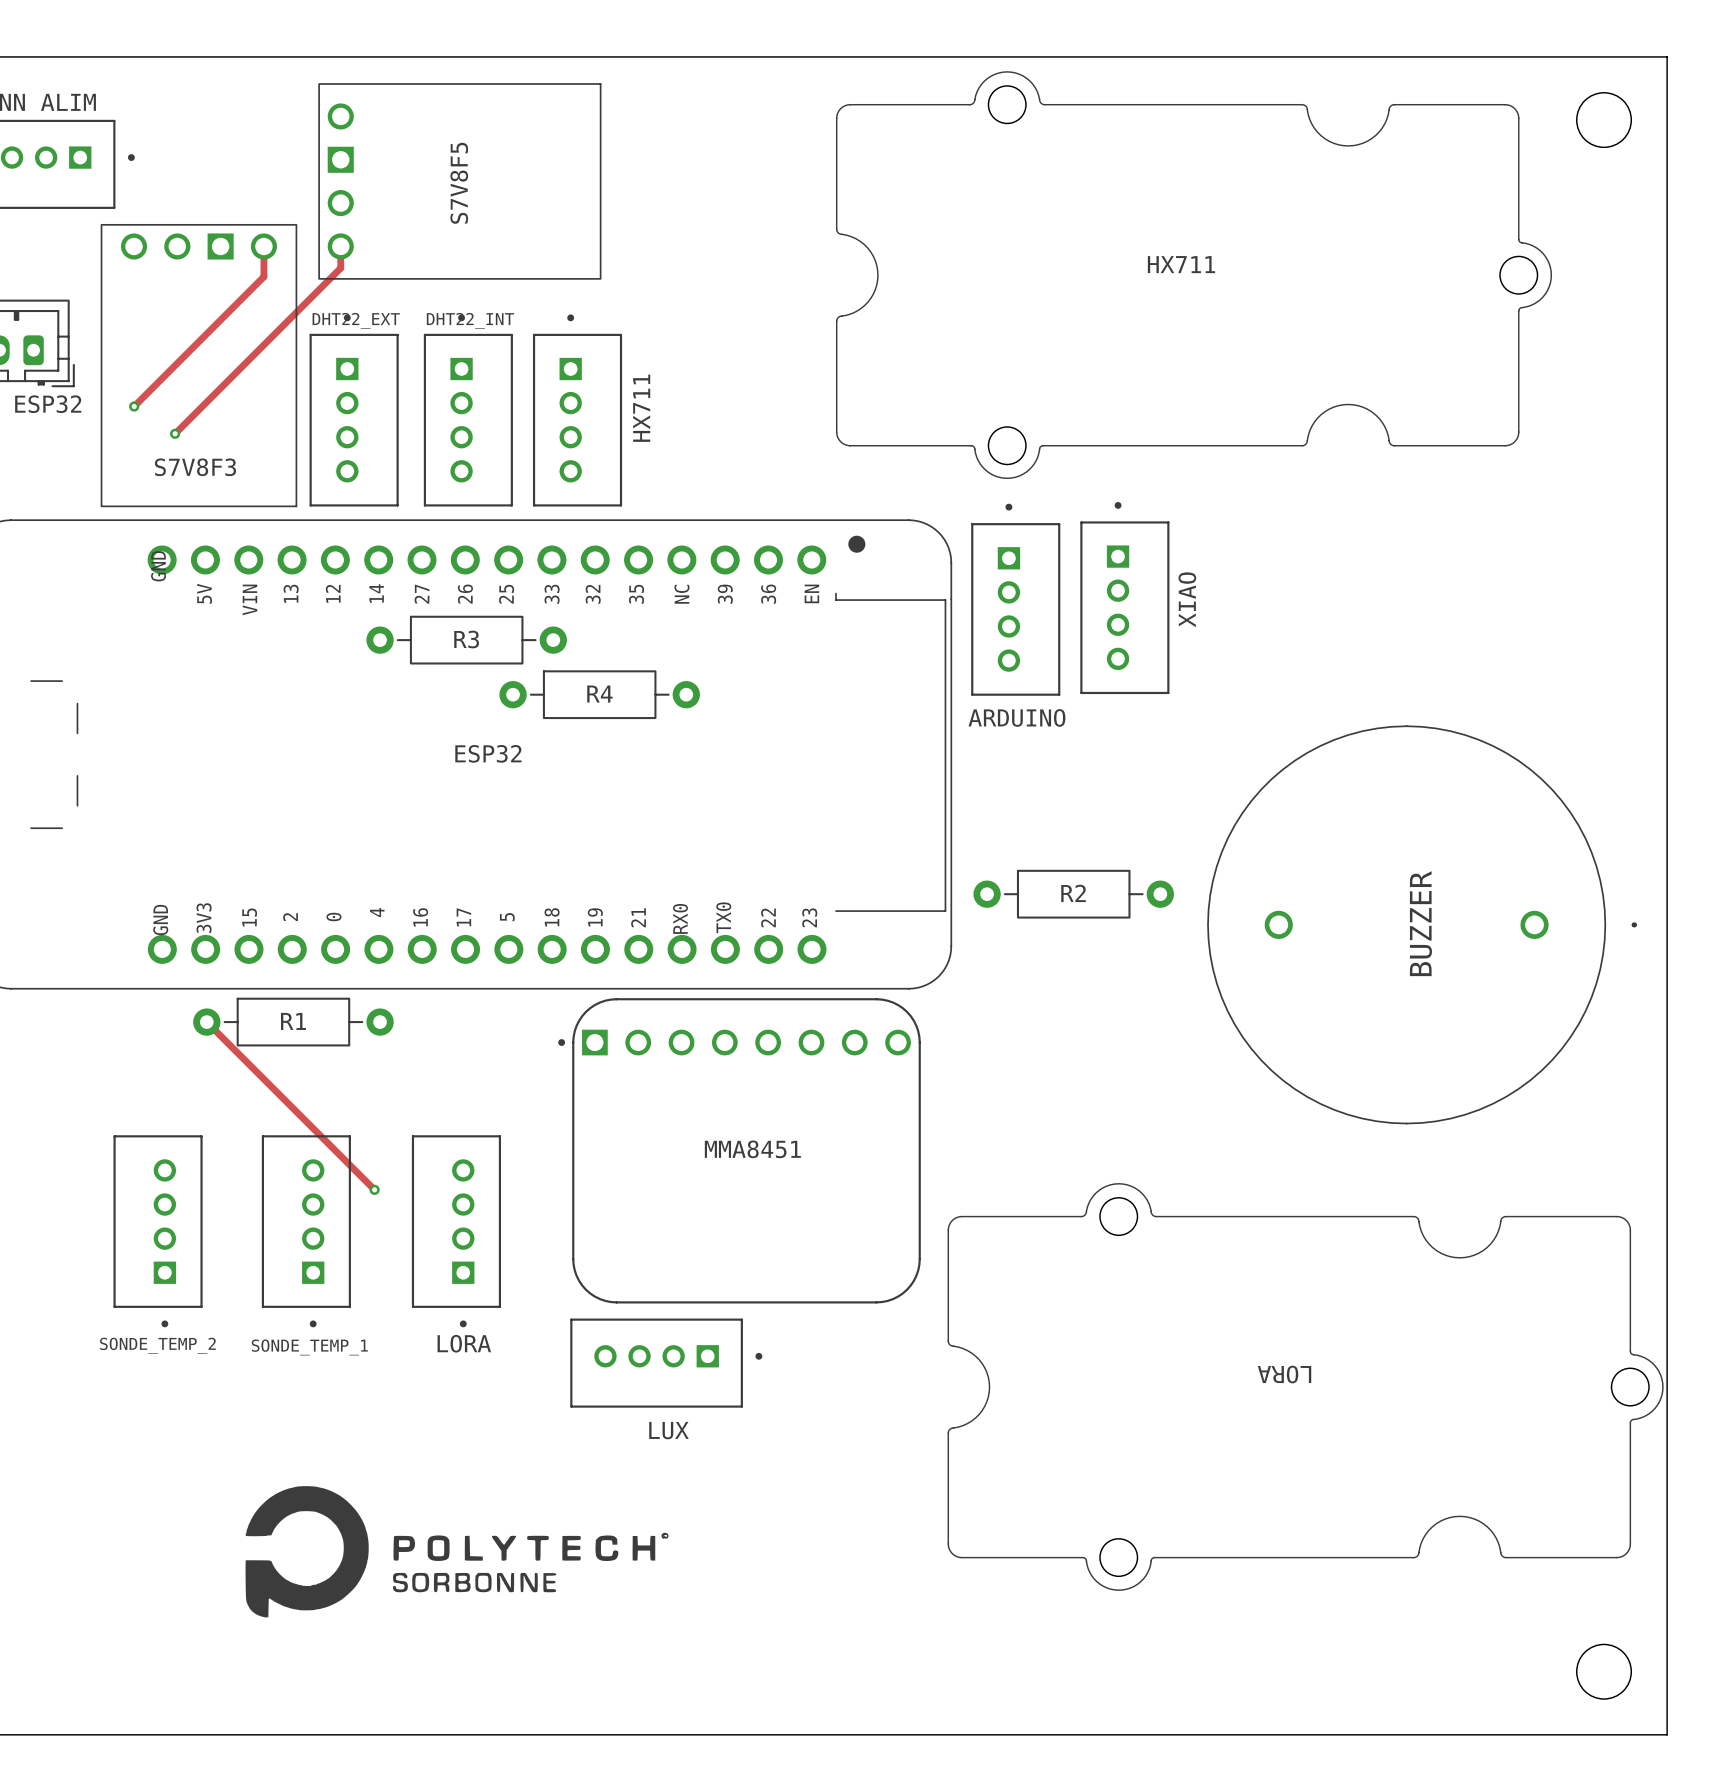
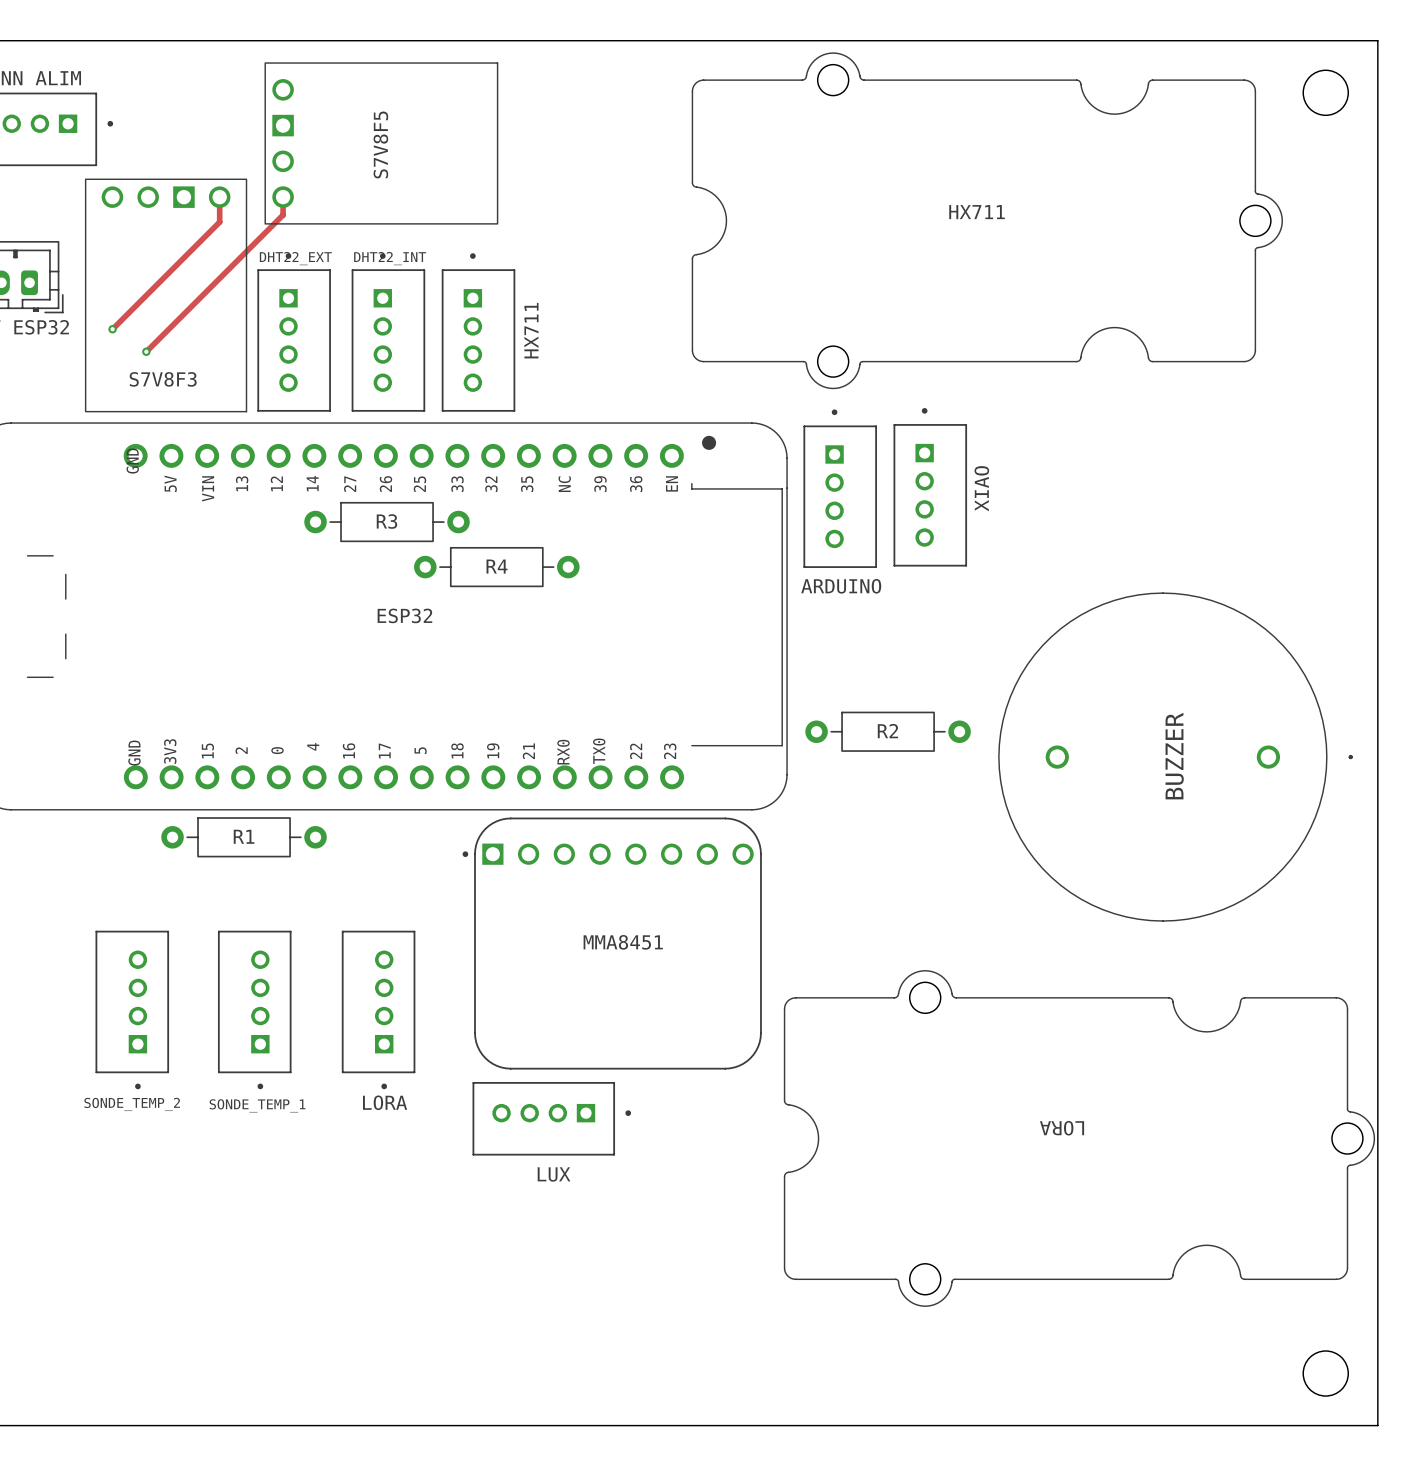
track: (206, 1022) (374, 1189) -> none
via: (374, 1189) -> none
drawing: [245, 1486, 669, 1618] -> none

